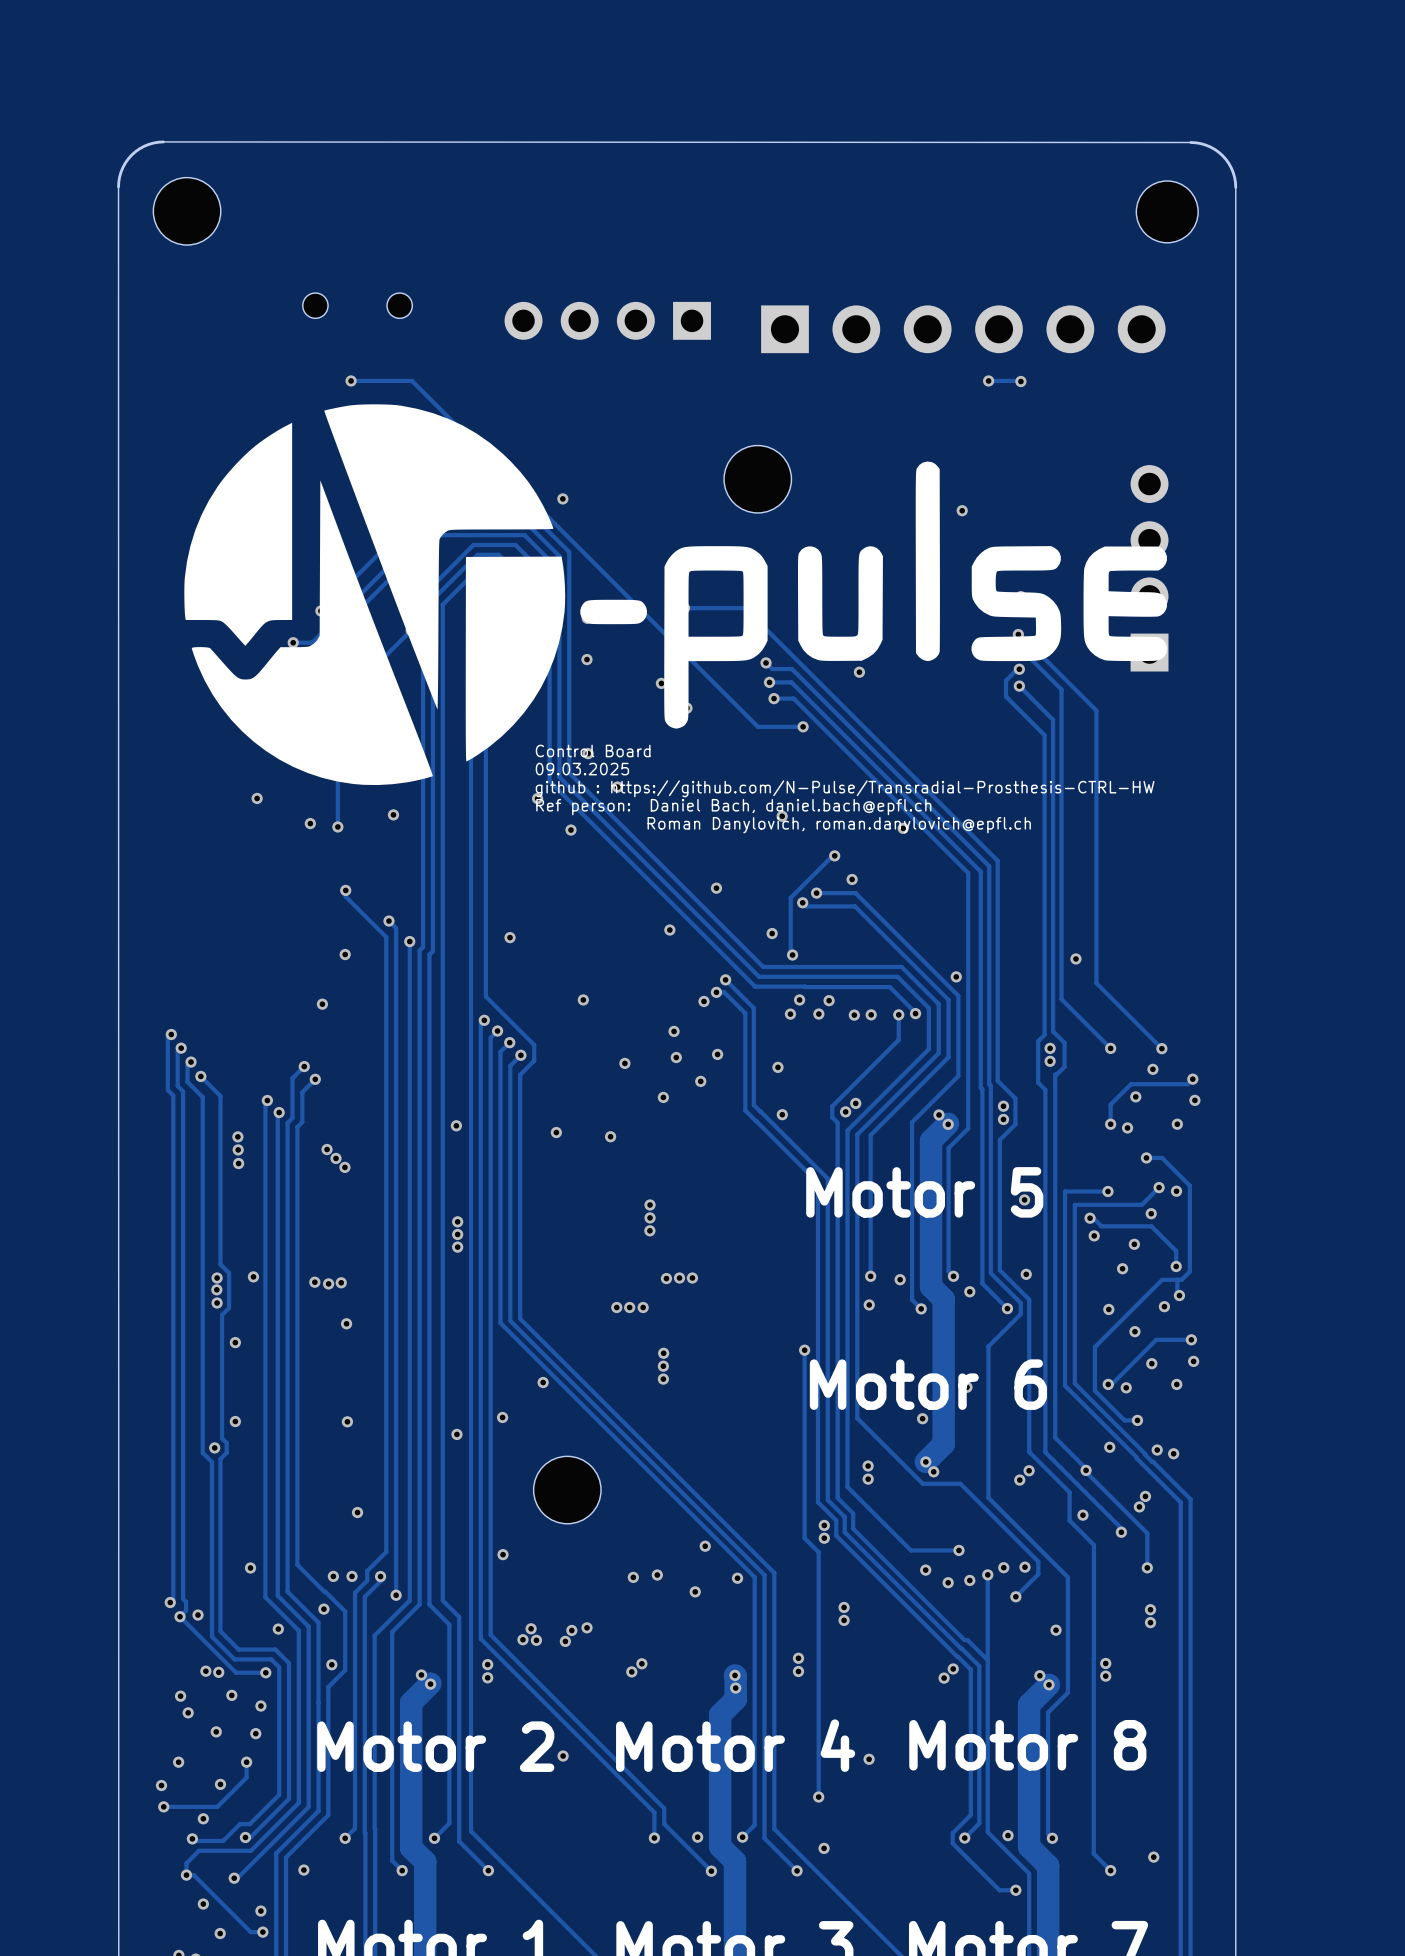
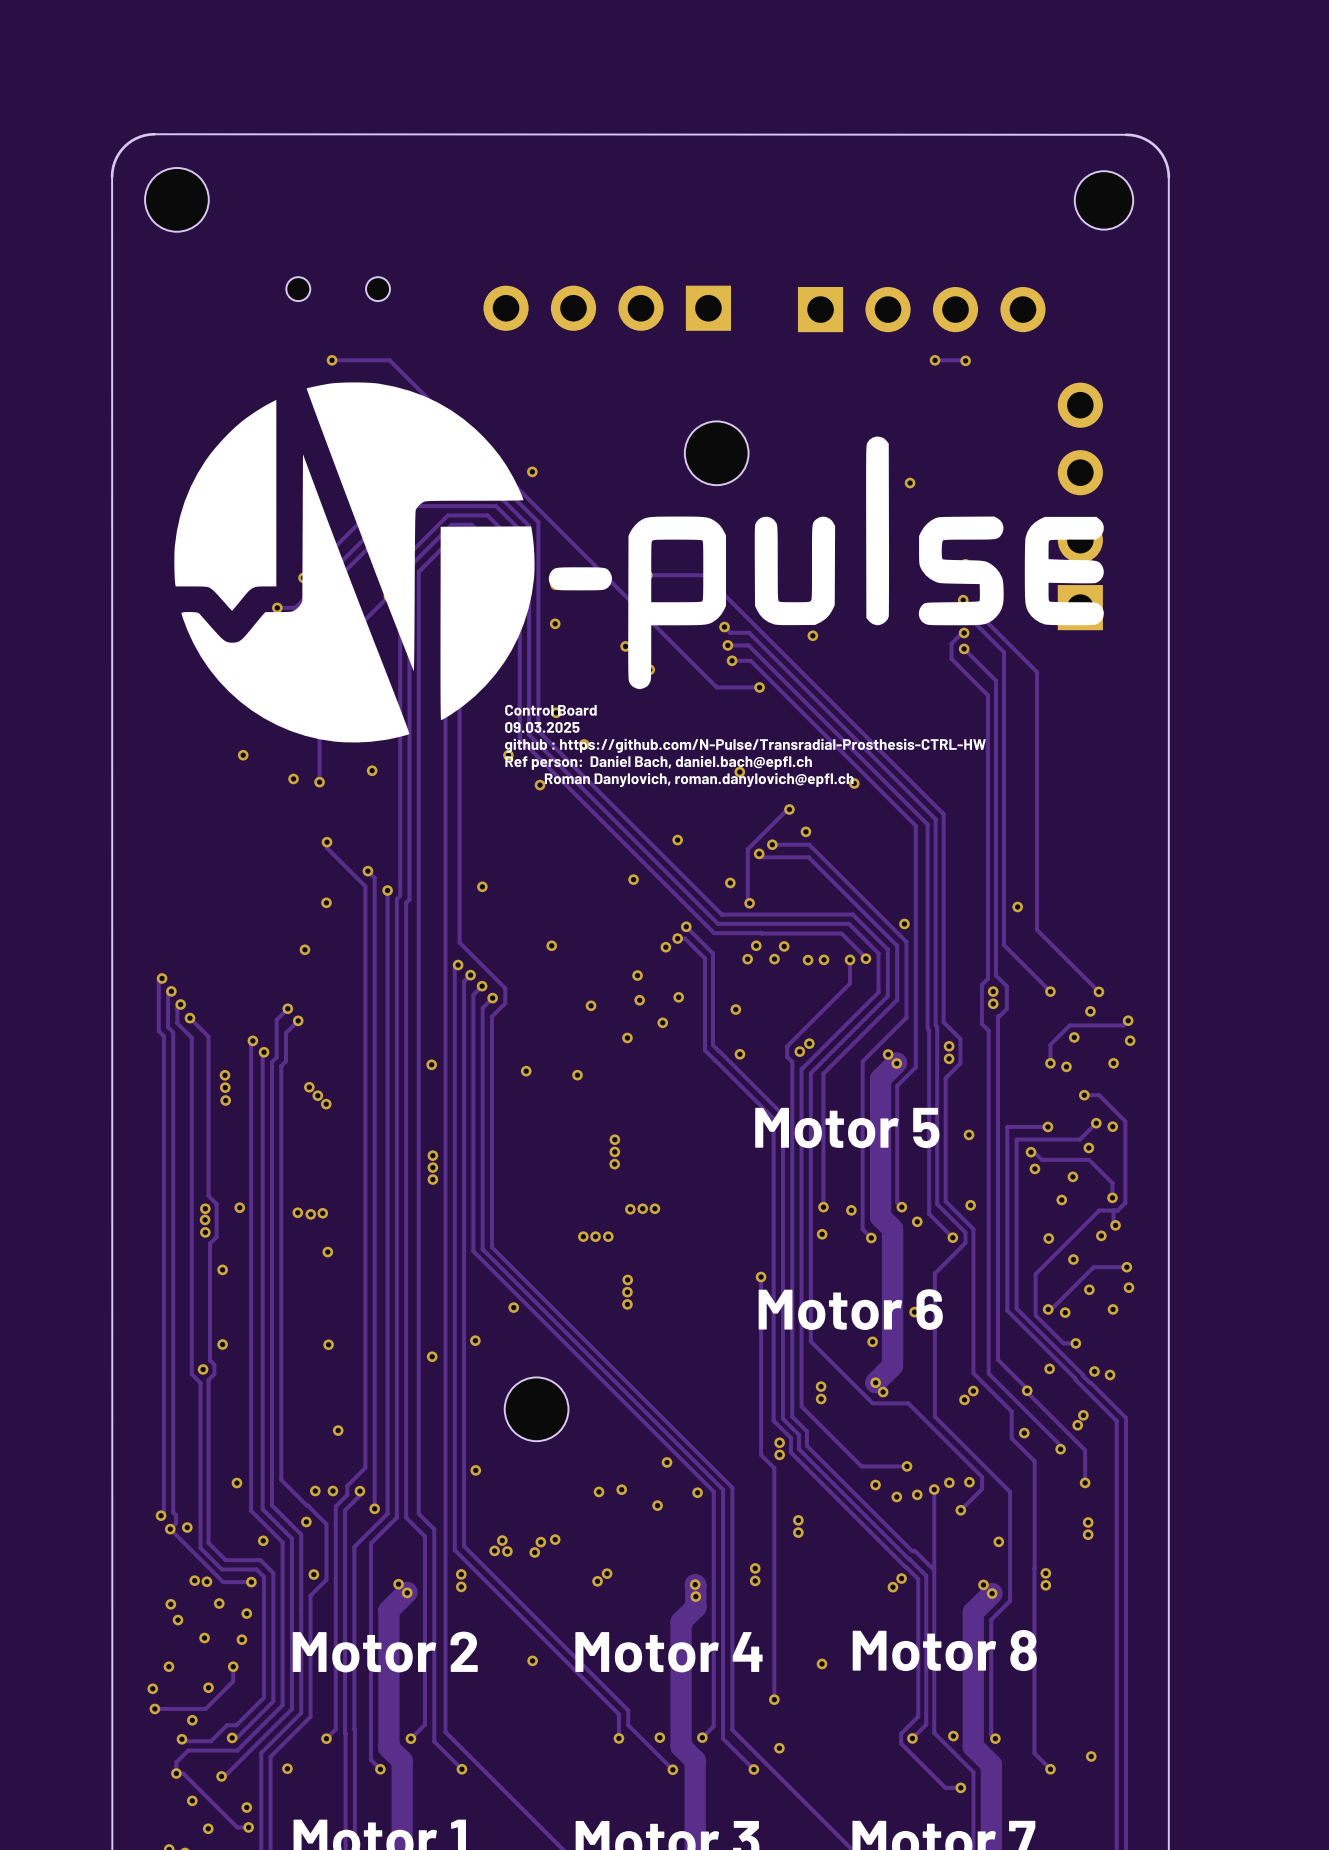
part footprint: [761, 305, 1166, 354] -> [797, 287, 1046, 333]
part: (607, 320) -> none
part: none -> (607, 308)
part: none -> (1080, 506)
part: (1149, 568) -> none

